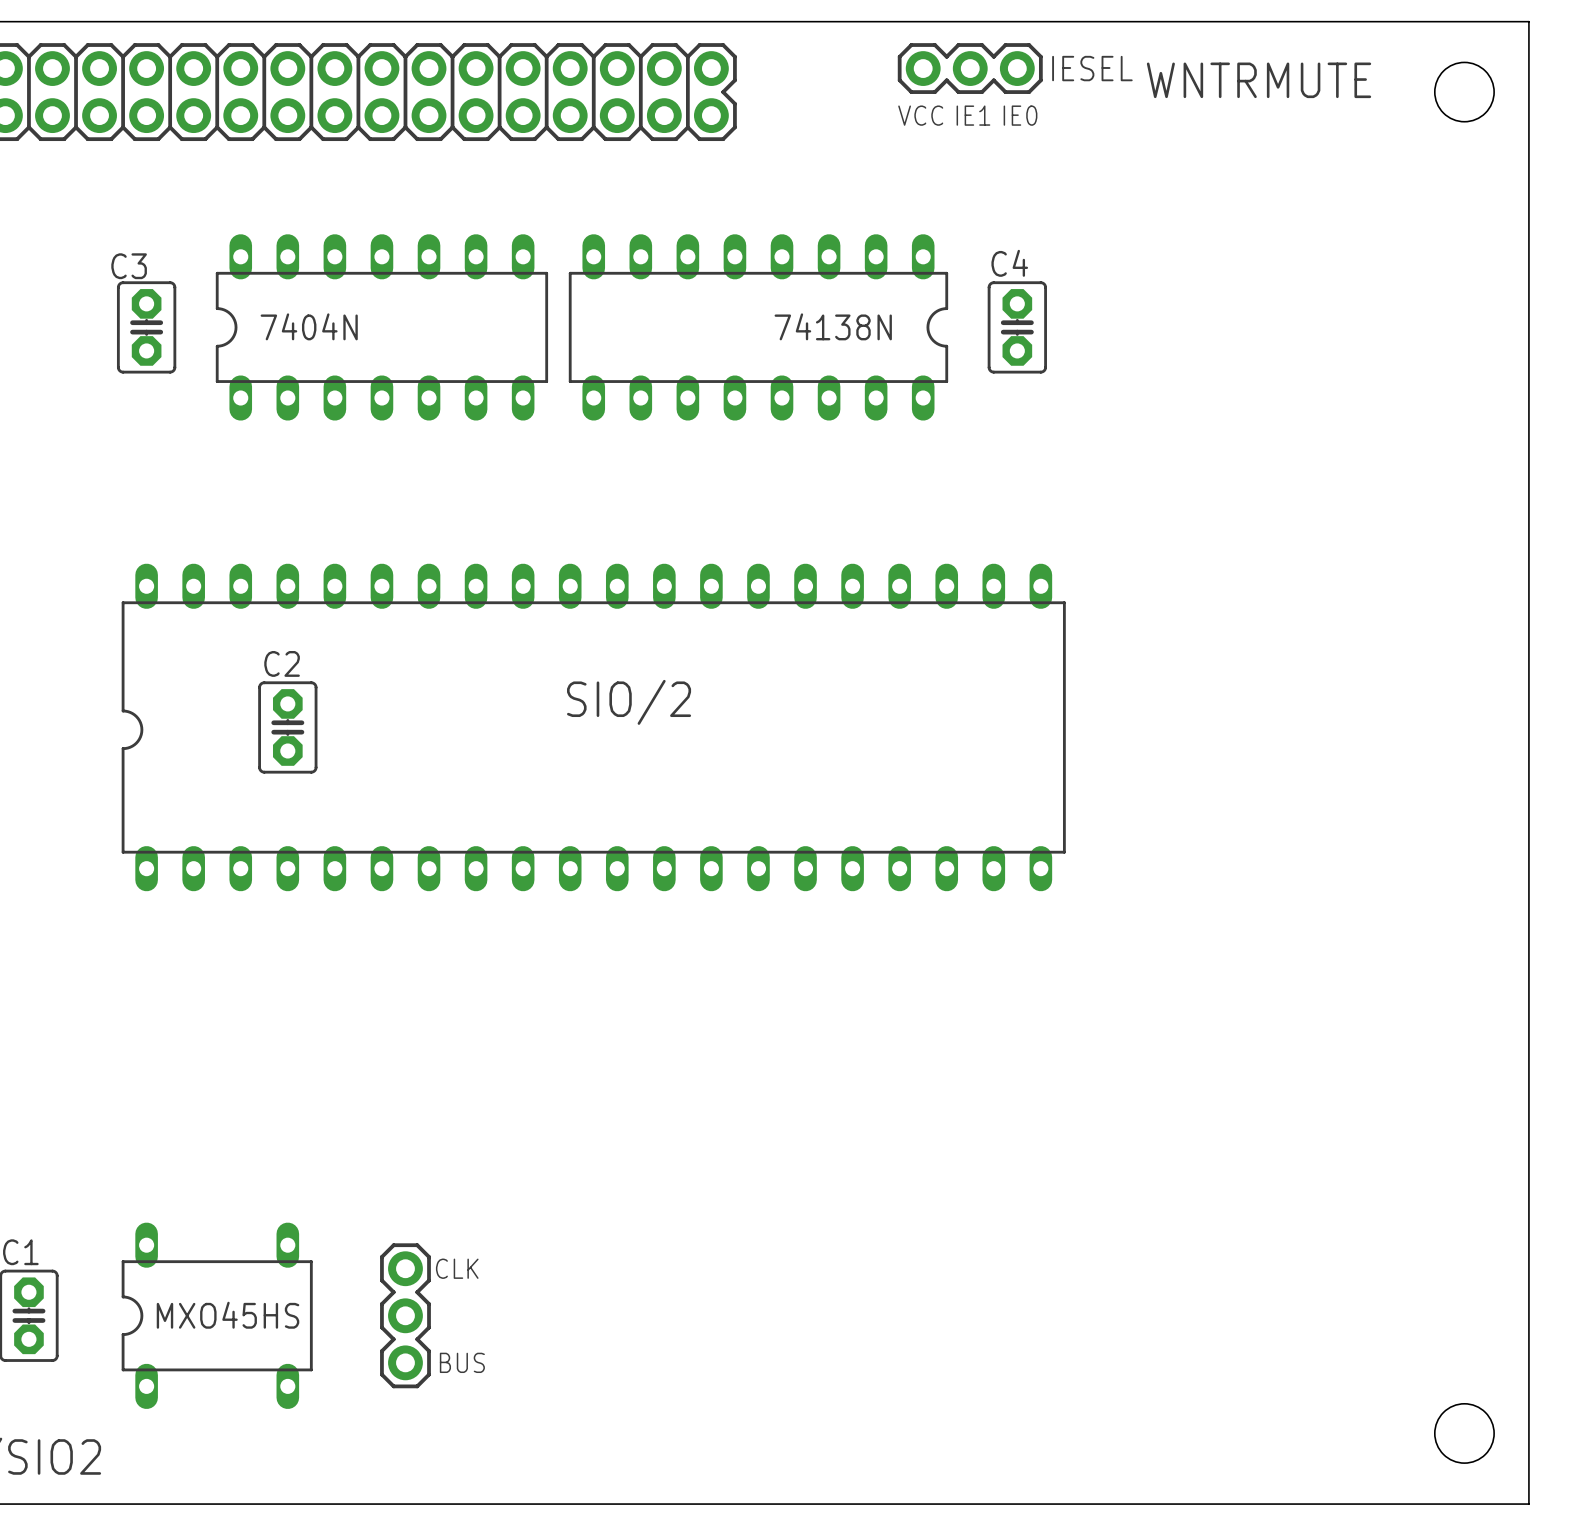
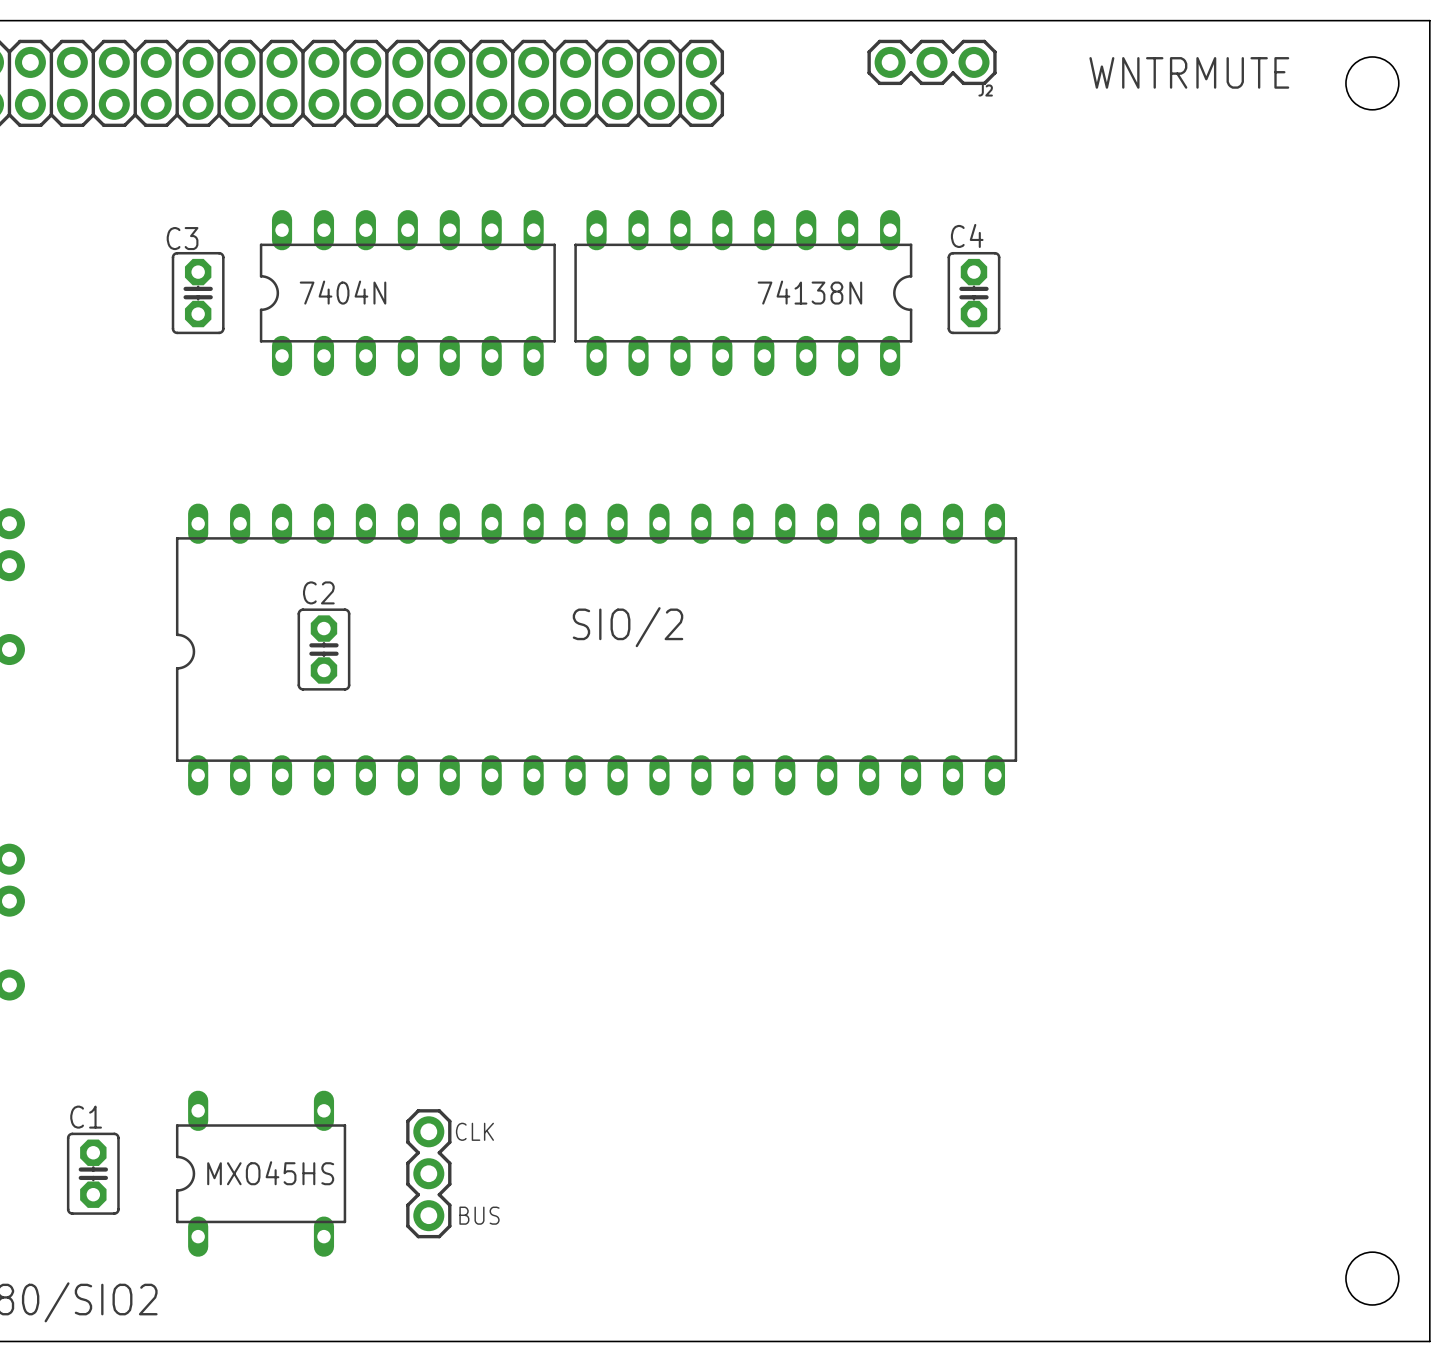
text: IESEL (1092, 68) -> none
J2 name: none -> J2 (985, 90)
text: VCC (920, 115) -> none
text: IE1 (973, 115) -> none
text: IE0 (1020, 115) -> none

